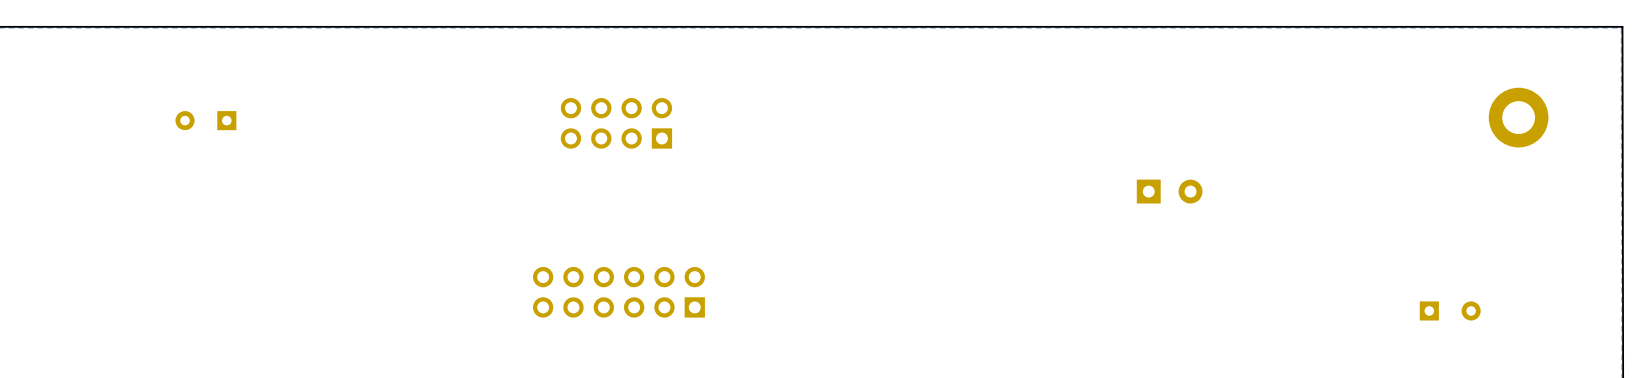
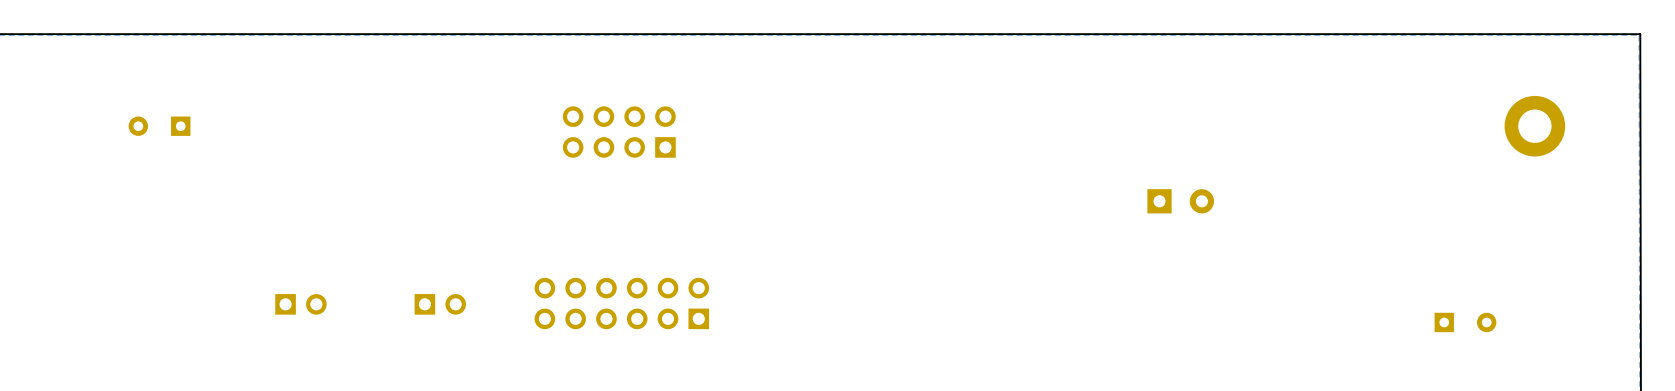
part position: (205, 120) -> (159, 126)
part: none -> (300, 304)
part: none -> (440, 304)

